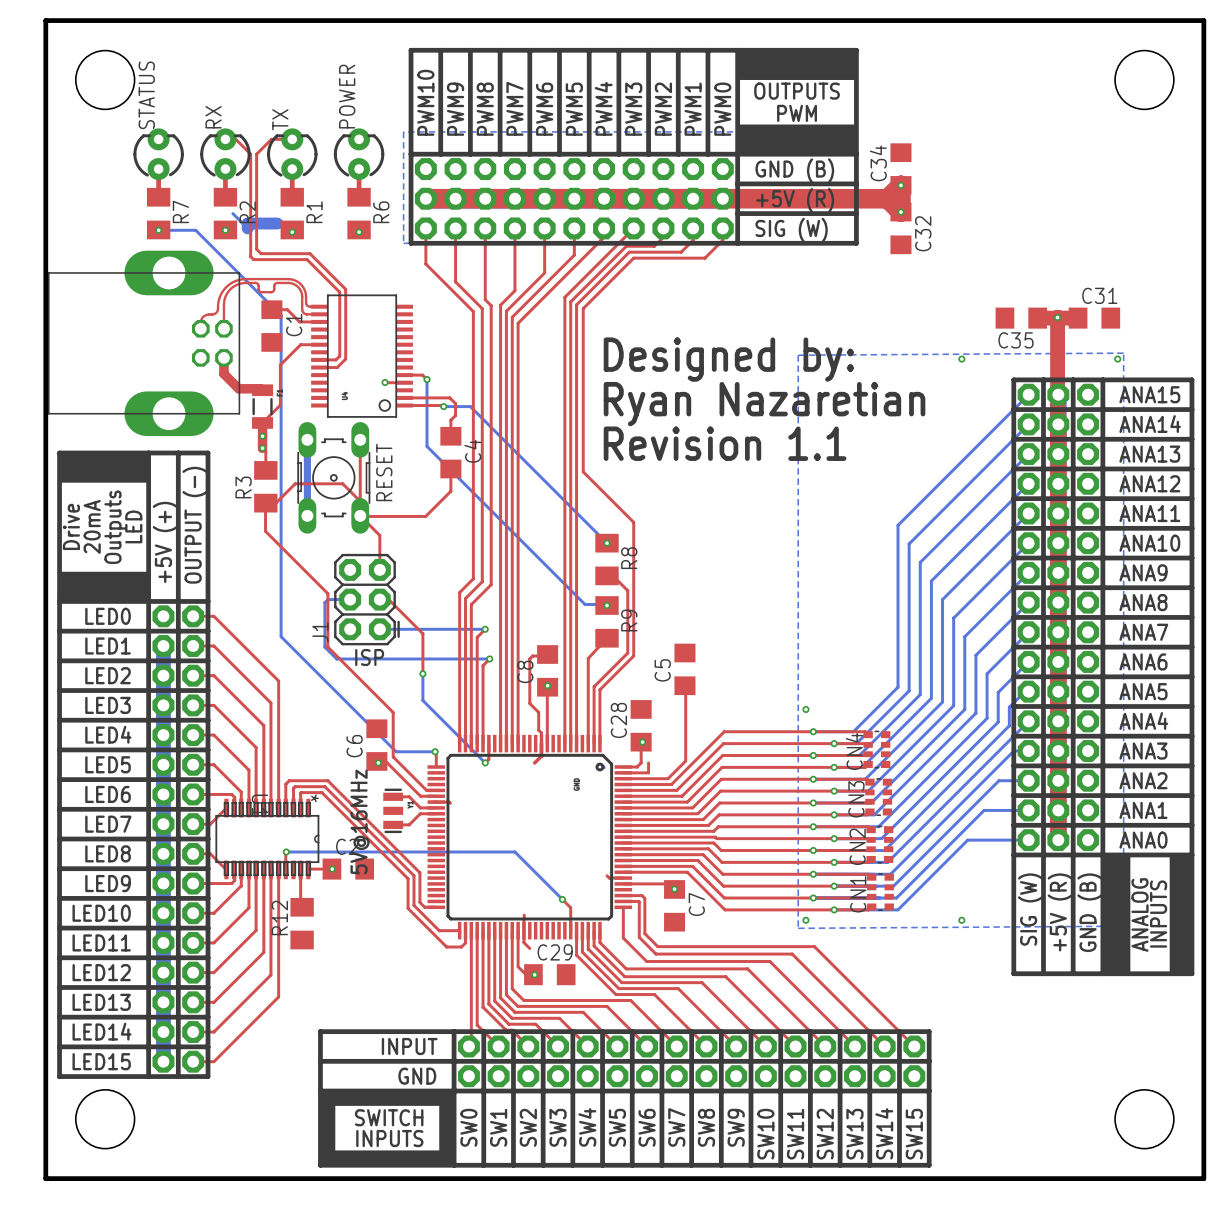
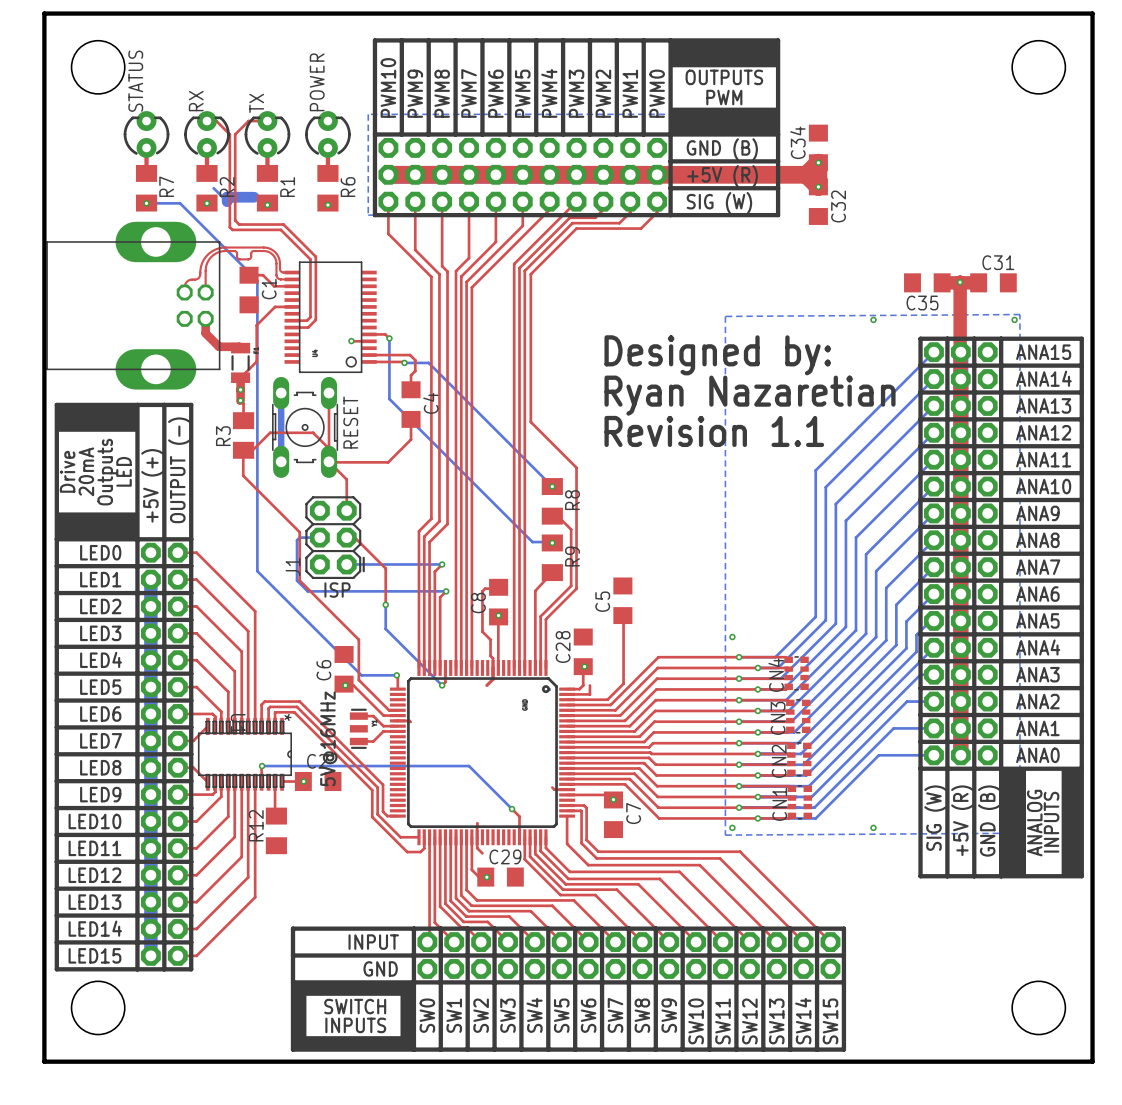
text position: Designed by: (728, 359) -> Designed by: (717, 355)
text position: Ryan Nazaretian (764, 404) -> Ryan Nazaretian (750, 395)
text position: Revision 1.1 (725, 443) -> Revision 1.1 (714, 431)

